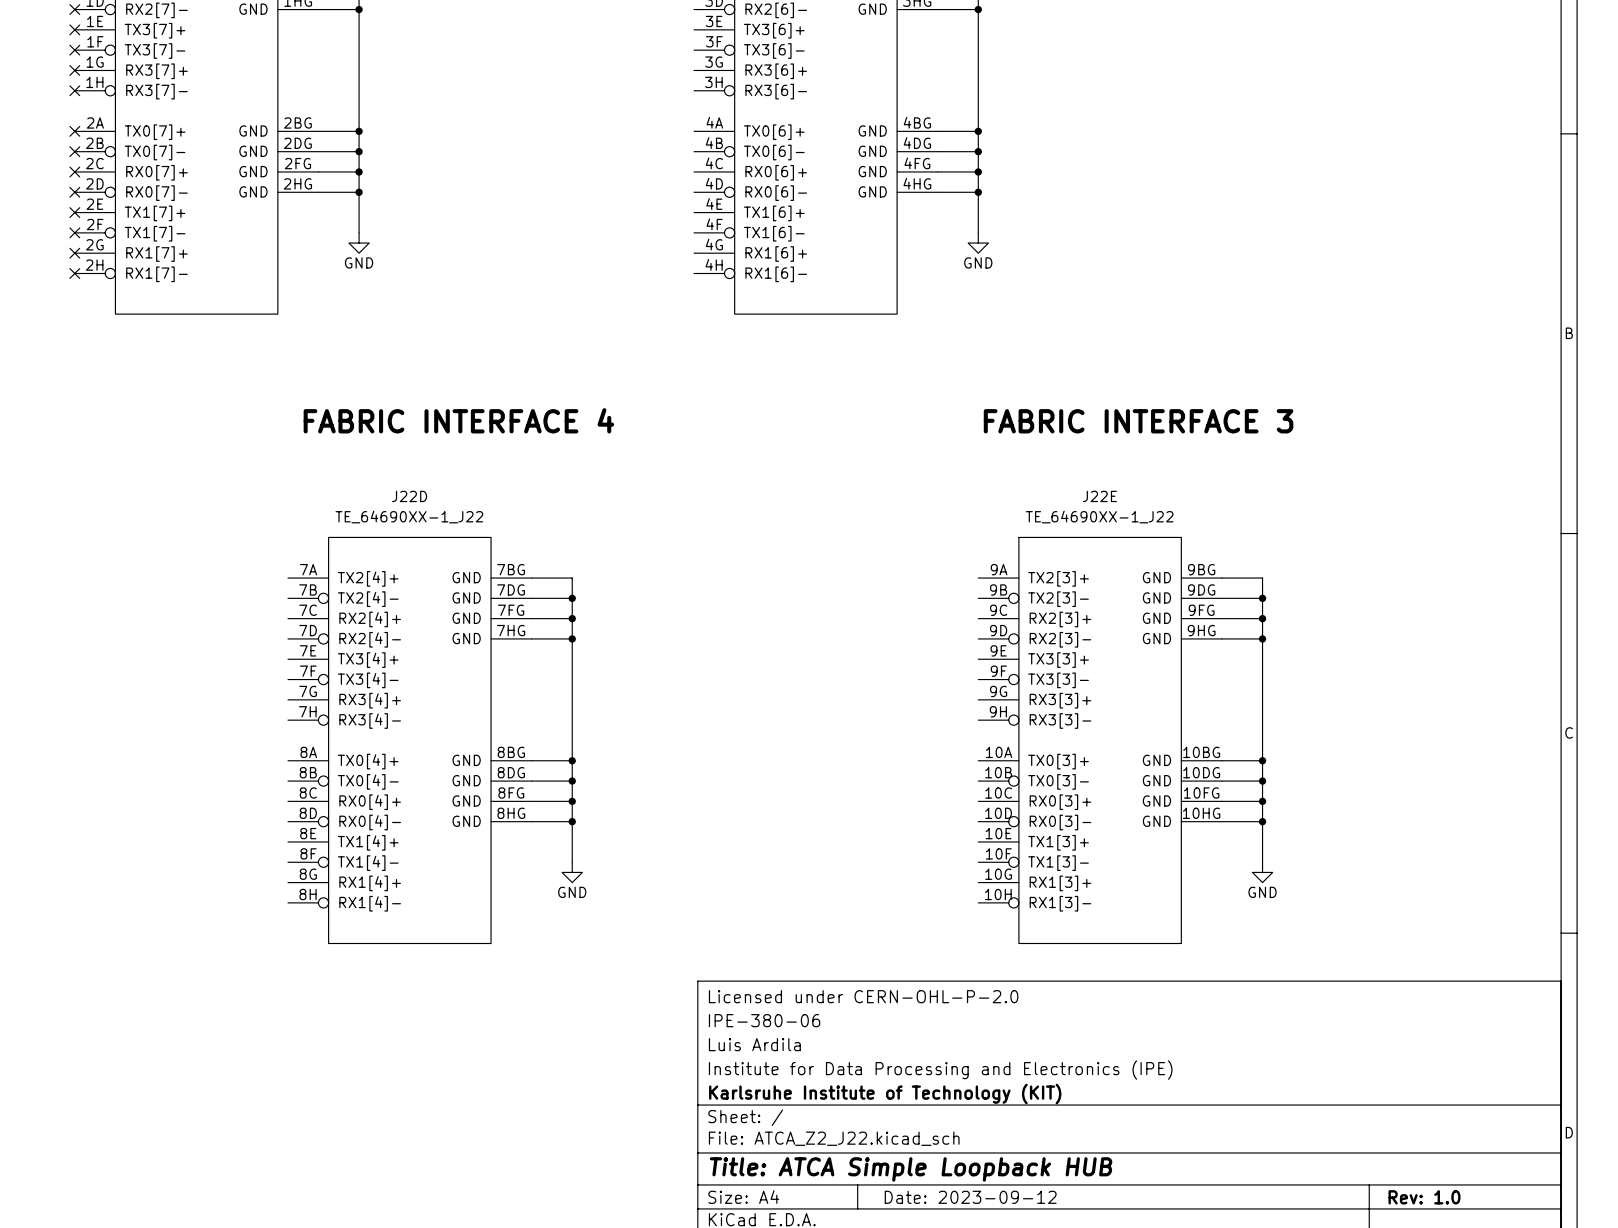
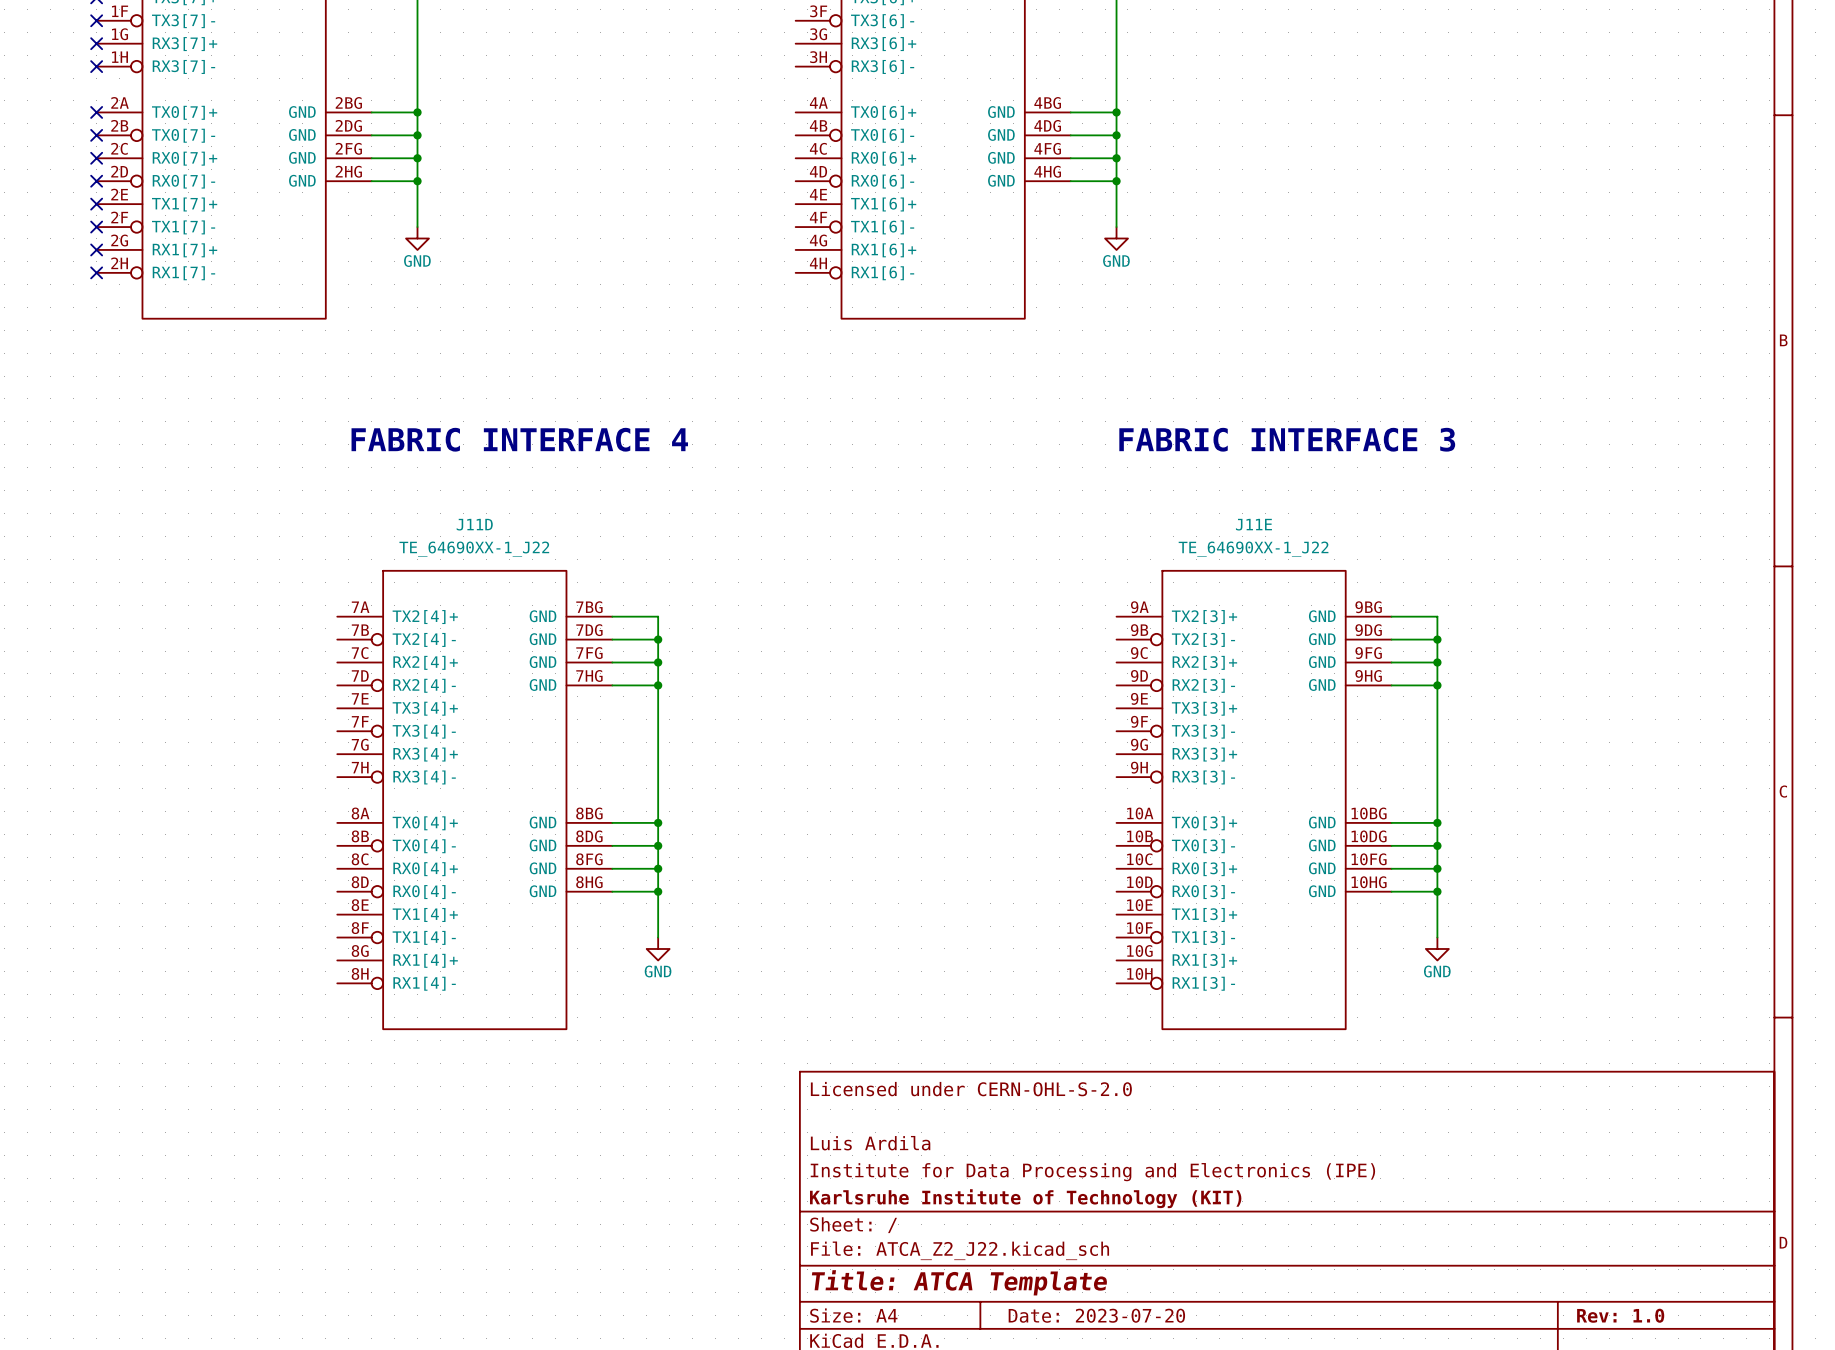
J22D name: J22D (409, 496) -> J11D (474, 524)
J22E name: J22E (1099, 496) -> J11E (1253, 524)
title block: Licensed under CERN-OHL-P-2.0 (863, 996) -> Licensed under CERN-OHL-S-2.0 (971, 1089)
title block: IPE-380-06 (764, 1020) -> none
title block: Title: ATCA Simple Loopback HUB (911, 1169) -> Title: ATCA Template (959, 1282)
title block: Date: 2023-09-12 (970, 1197) -> Date: 2023-07-20 (1096, 1315)

